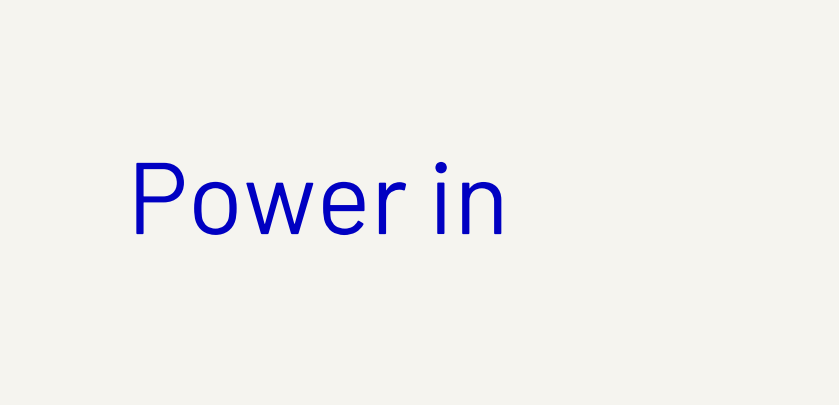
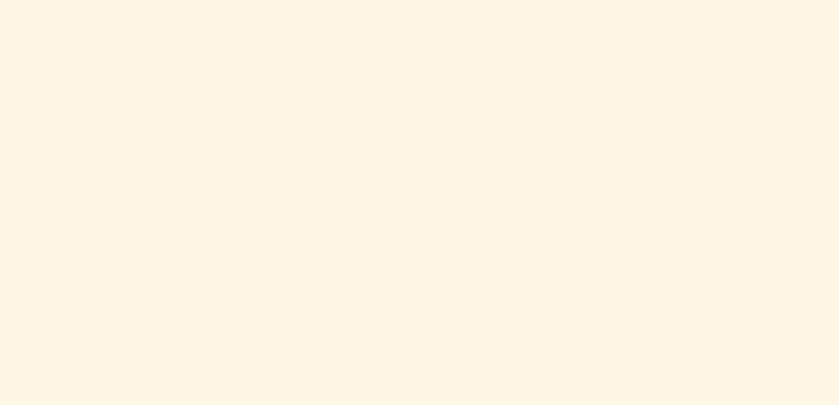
text: Power in (318, 198) -> none

